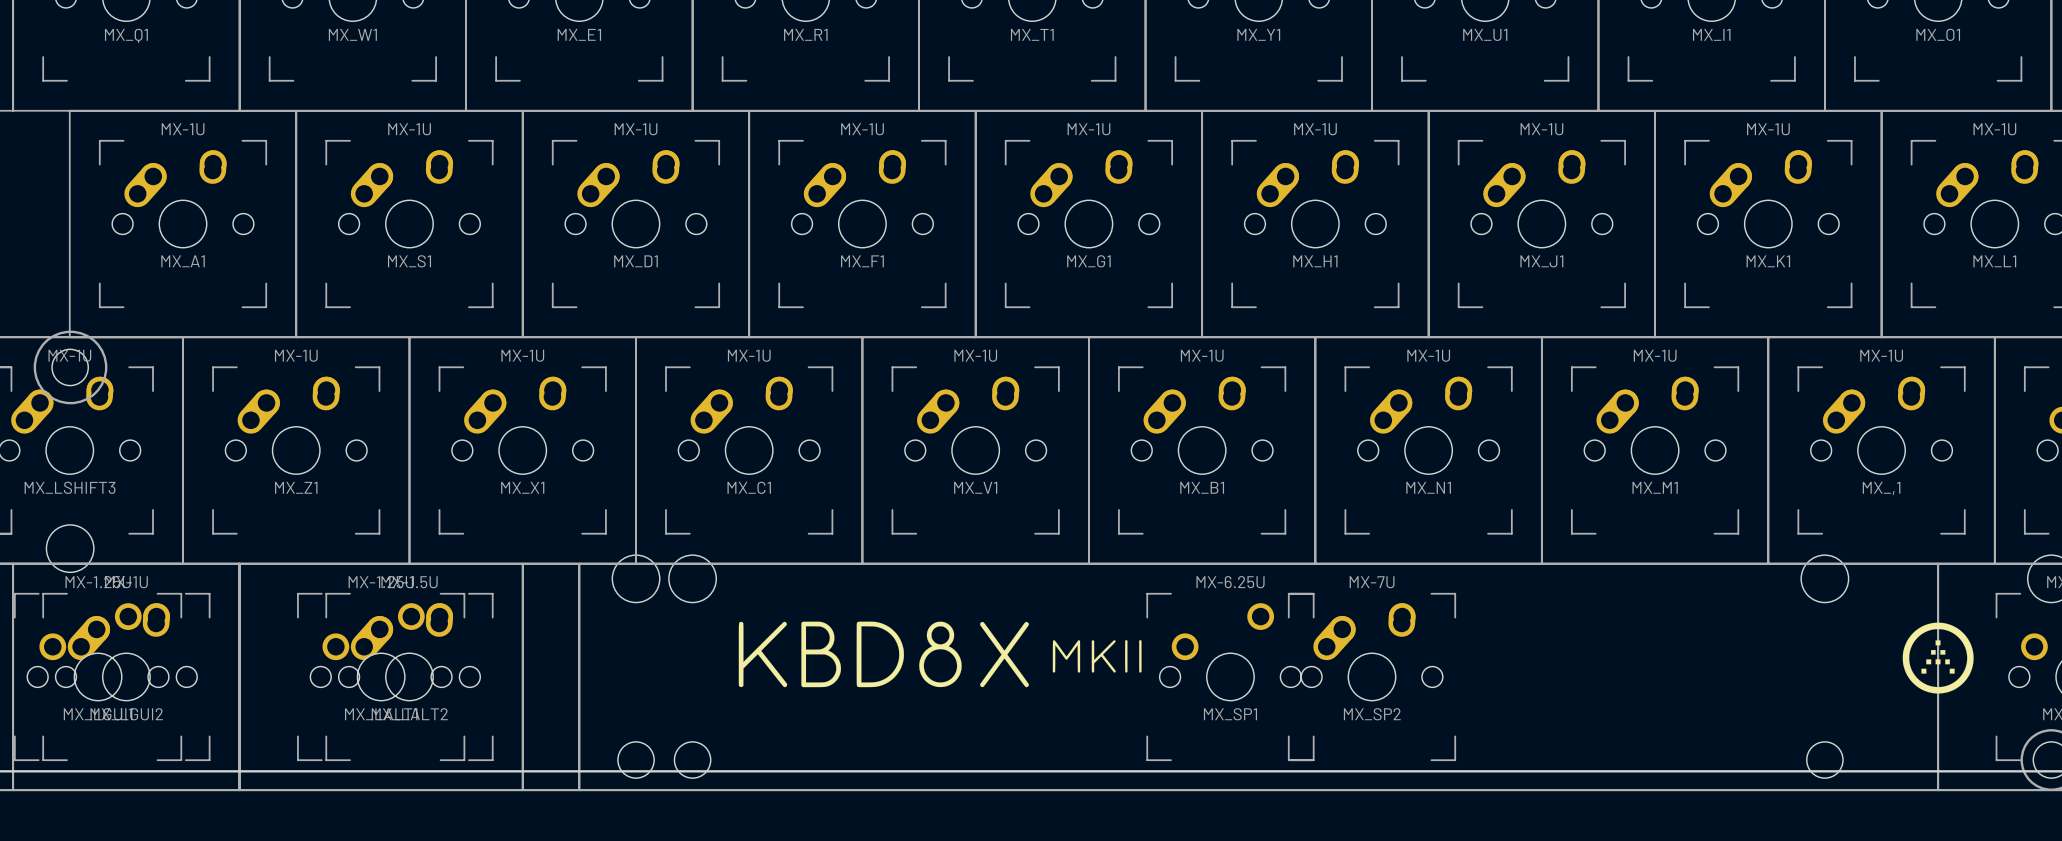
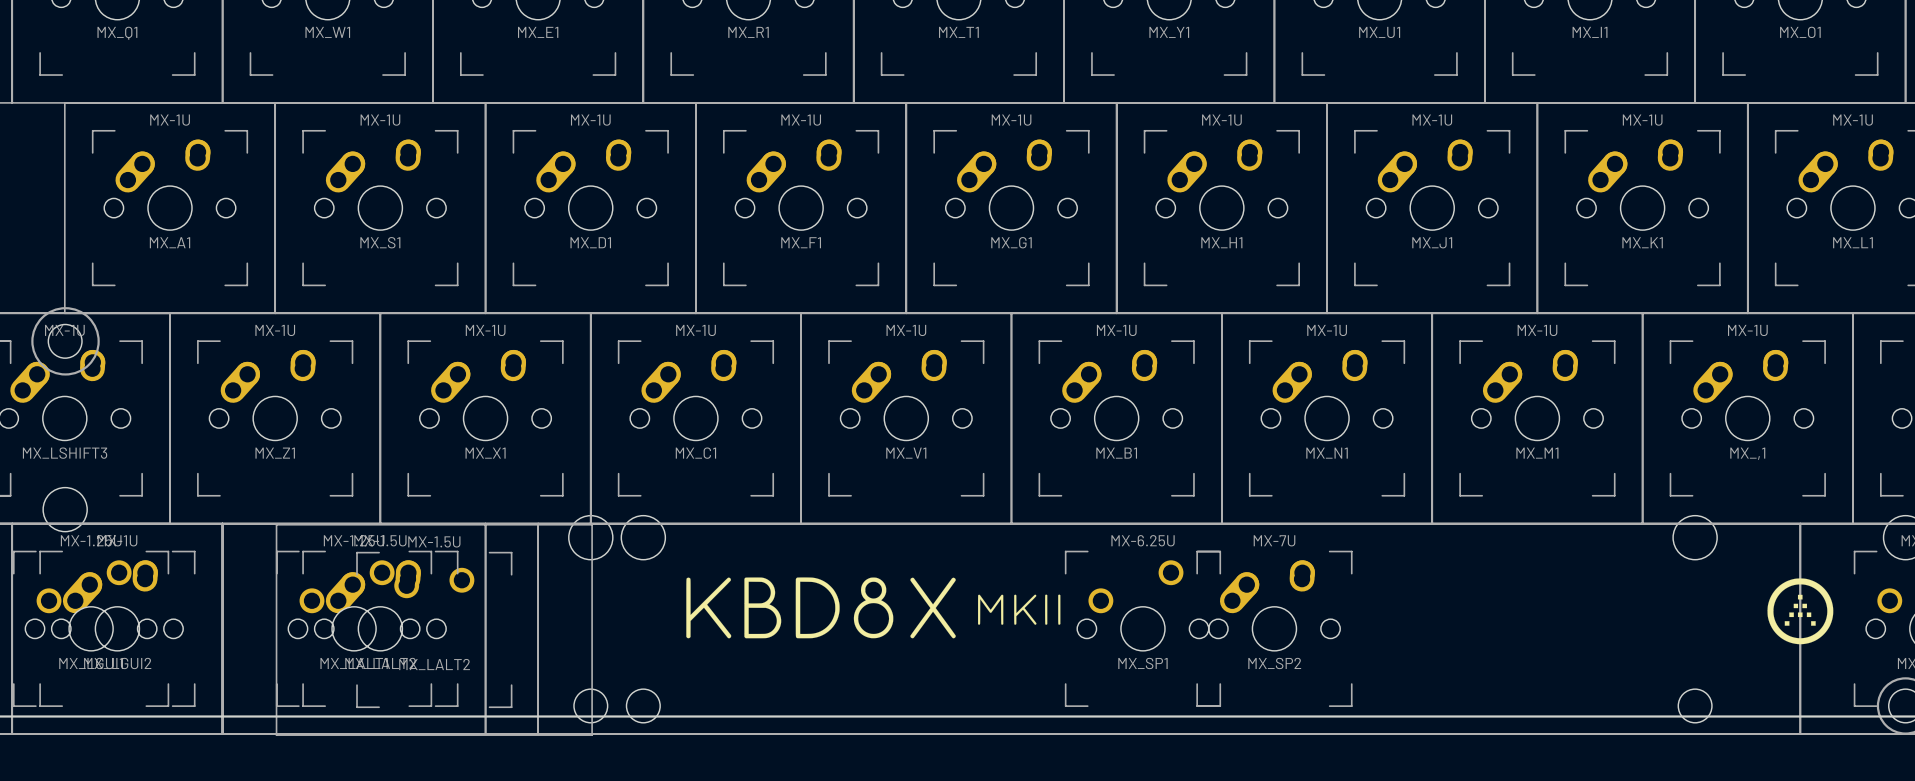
MX_LALT2: none -> MX-1.5U (434, 629)

